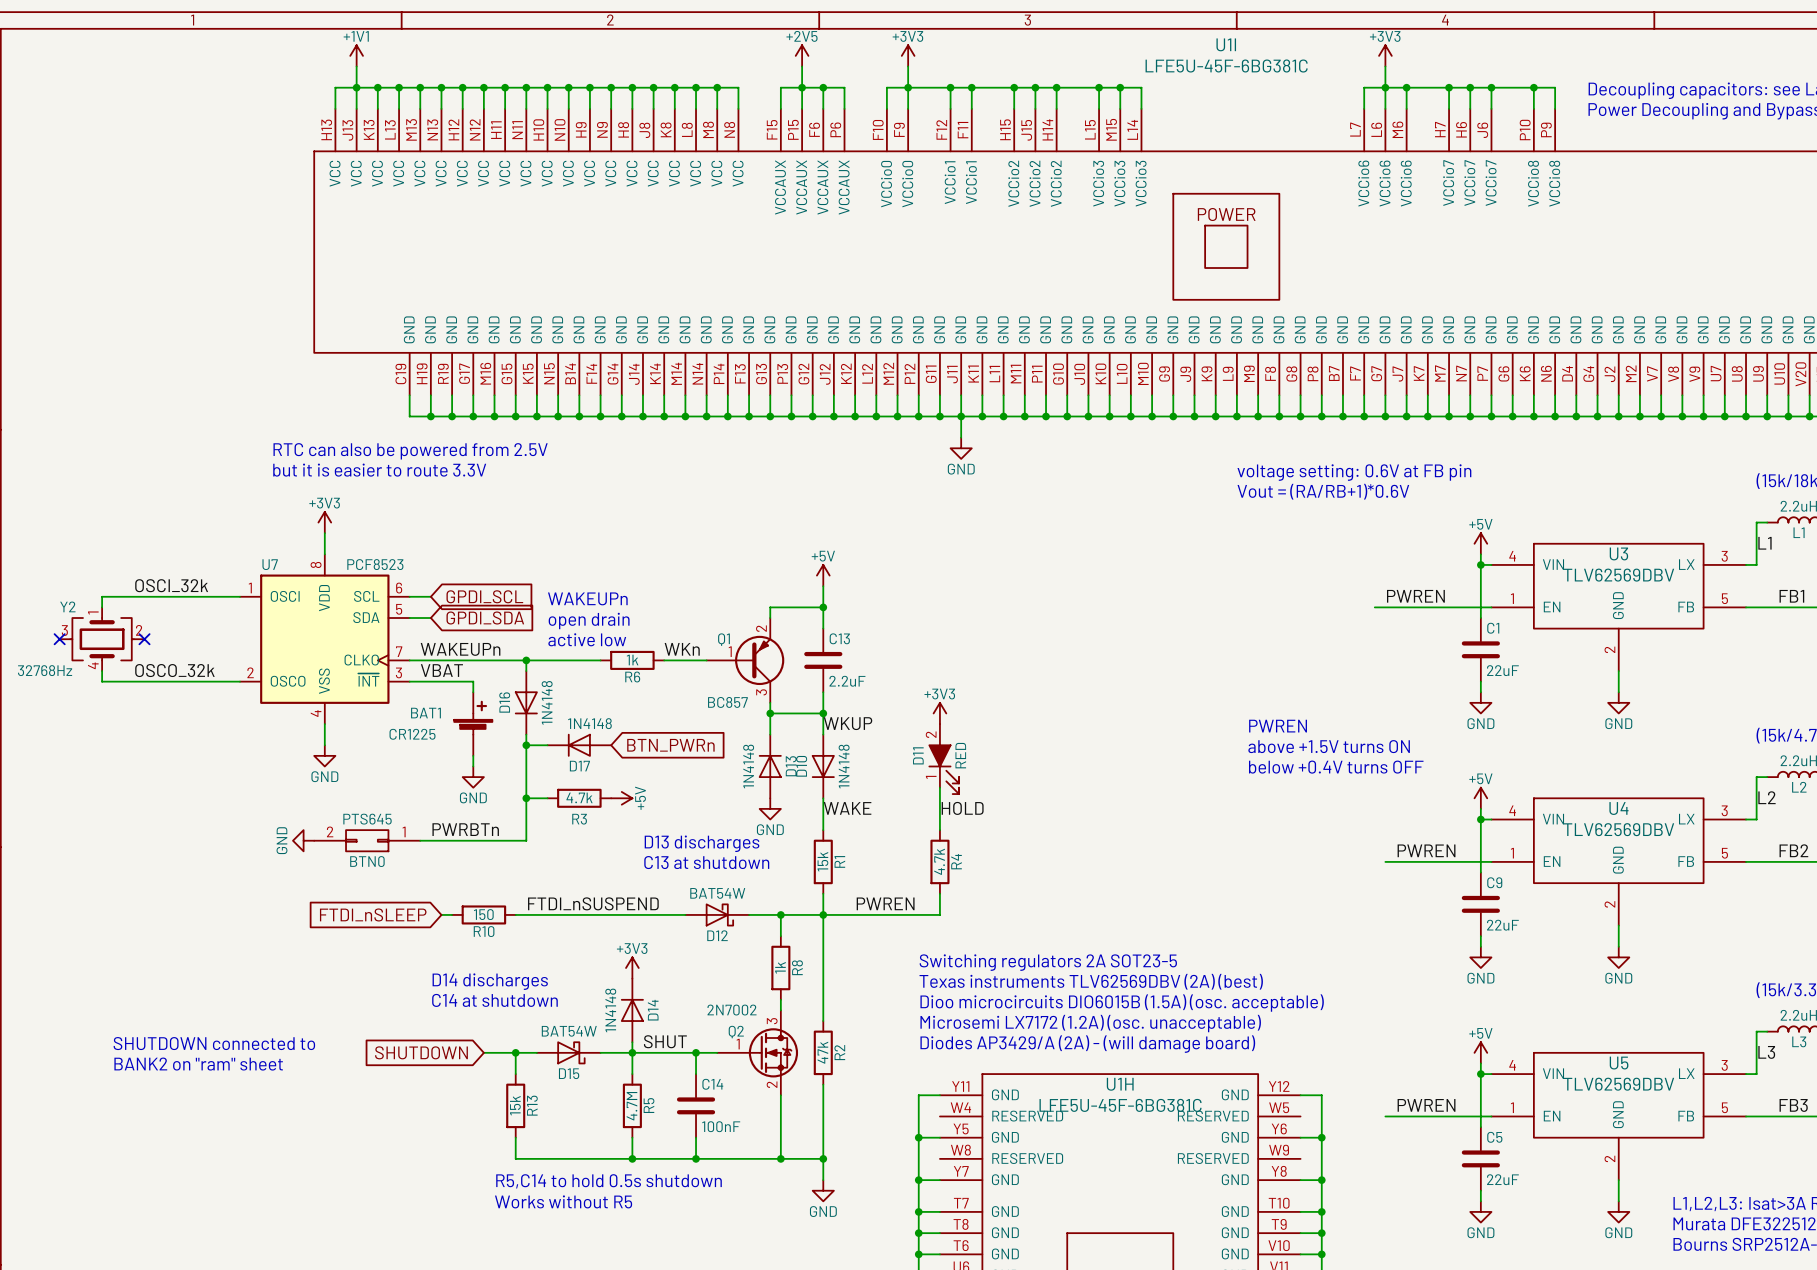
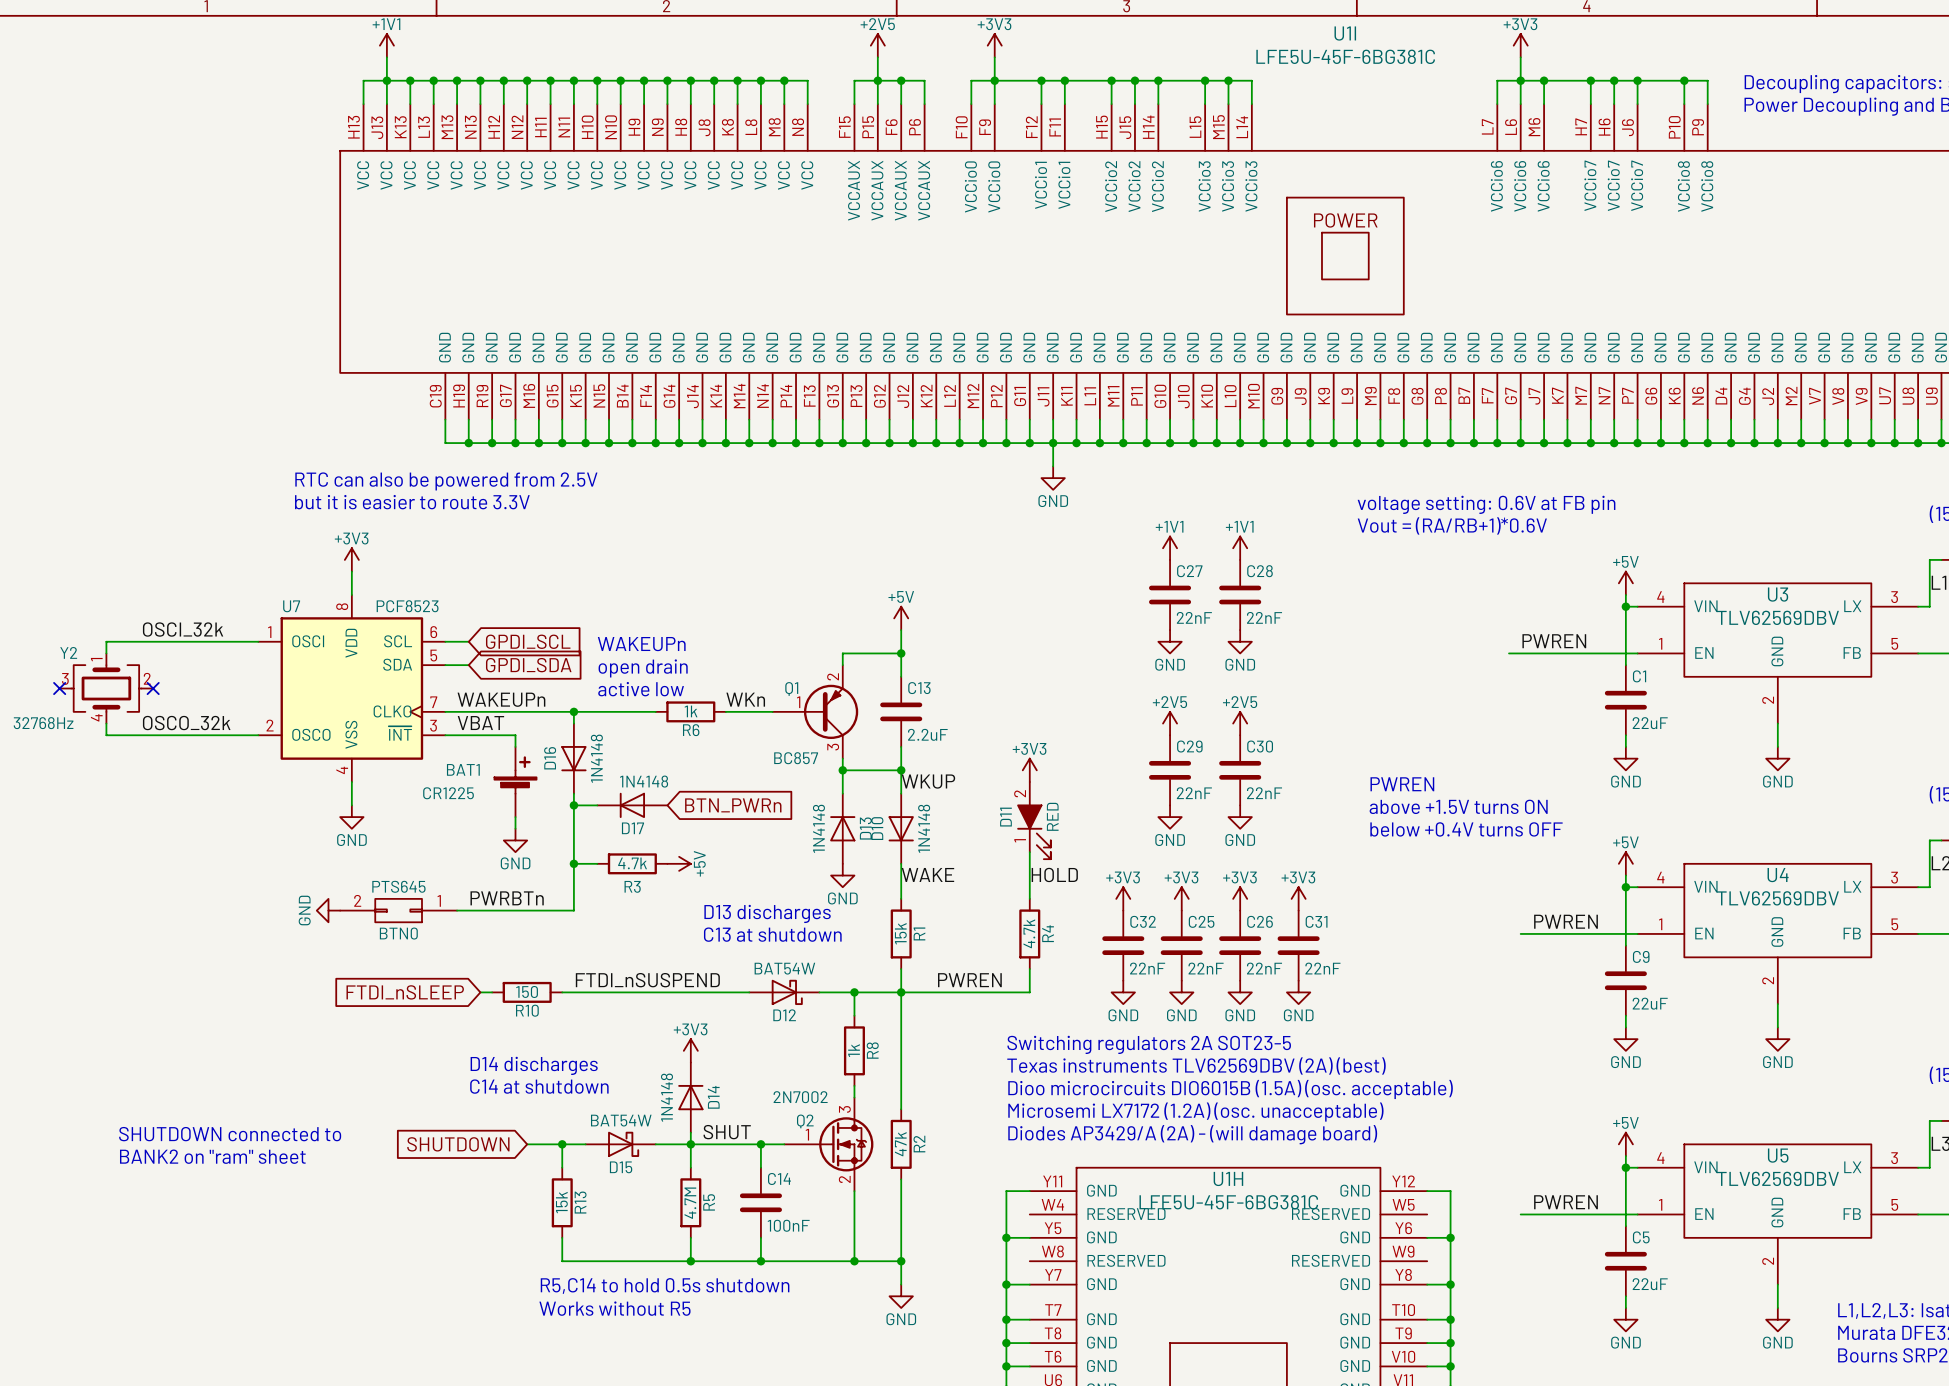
power symbol: none -> +1V1 (1170, 548)
power symbol: none -> +1V1 (1240, 548)
C27: none -> 22nF (1170, 595)
C28: none -> 22nF (1240, 595)
power symbol: none -> GND (1170, 641)
power symbol: none -> GND (1240, 641)
power symbol: none -> +2V5 (1170, 723)
power symbol: none -> +2V5 (1240, 723)
C29: none -> 22nF (1170, 770)
C30: none -> 22nF (1240, 770)
power symbol: none -> GND (1170, 817)
power symbol: none -> GND (1240, 817)
power symbol: none -> +3V3 (1123, 898)
power symbol: none -> +3V3 (1181, 898)
power symbol: none -> +3V3 (1240, 898)
power symbol: none -> +3V3 (1298, 898)
C32: none -> 22nF (1123, 945)
C25: none -> 22nF (1181, 945)
C26: none -> 22nF (1240, 945)
C31: none -> 22nF (1298, 945)
power symbol: none -> GND (1123, 992)
power symbol: none -> GND (1181, 992)
power symbol: none -> GND (1240, 992)
power symbol: none -> GND (1298, 992)

